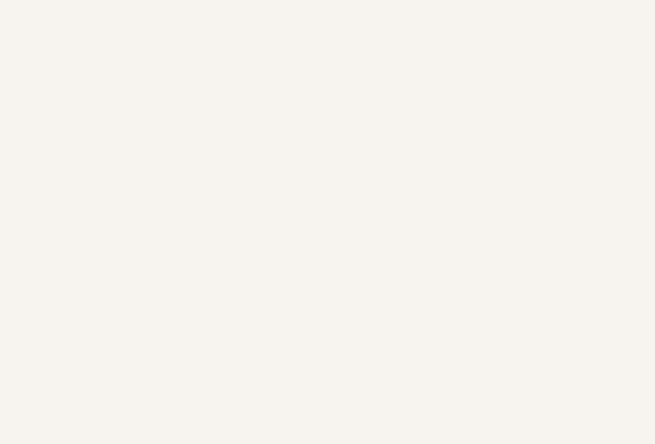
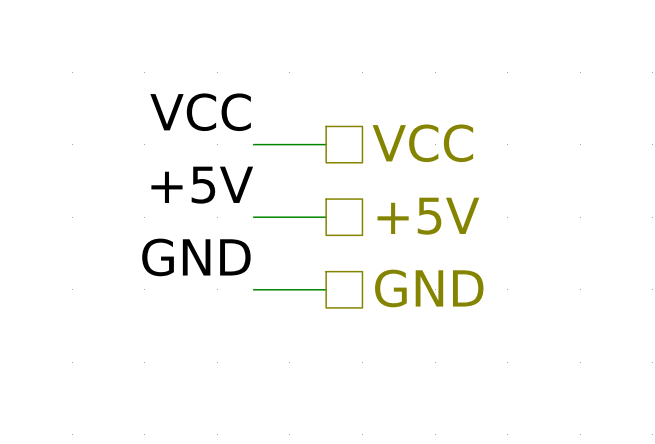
label: none -> VCC (200, 112)
hierarchical label: none -> VCC (422, 143)
wire: none -> (253, 144) (326, 144)
label: none -> +5V (202, 185)
hierarchical label: none -> +5V (428, 216)
wire: none -> (253, 217) (326, 217)
label: none -> GND (196, 257)
hierarchical label: none -> GND (429, 288)
wire: none -> (253, 289) (326, 289)

